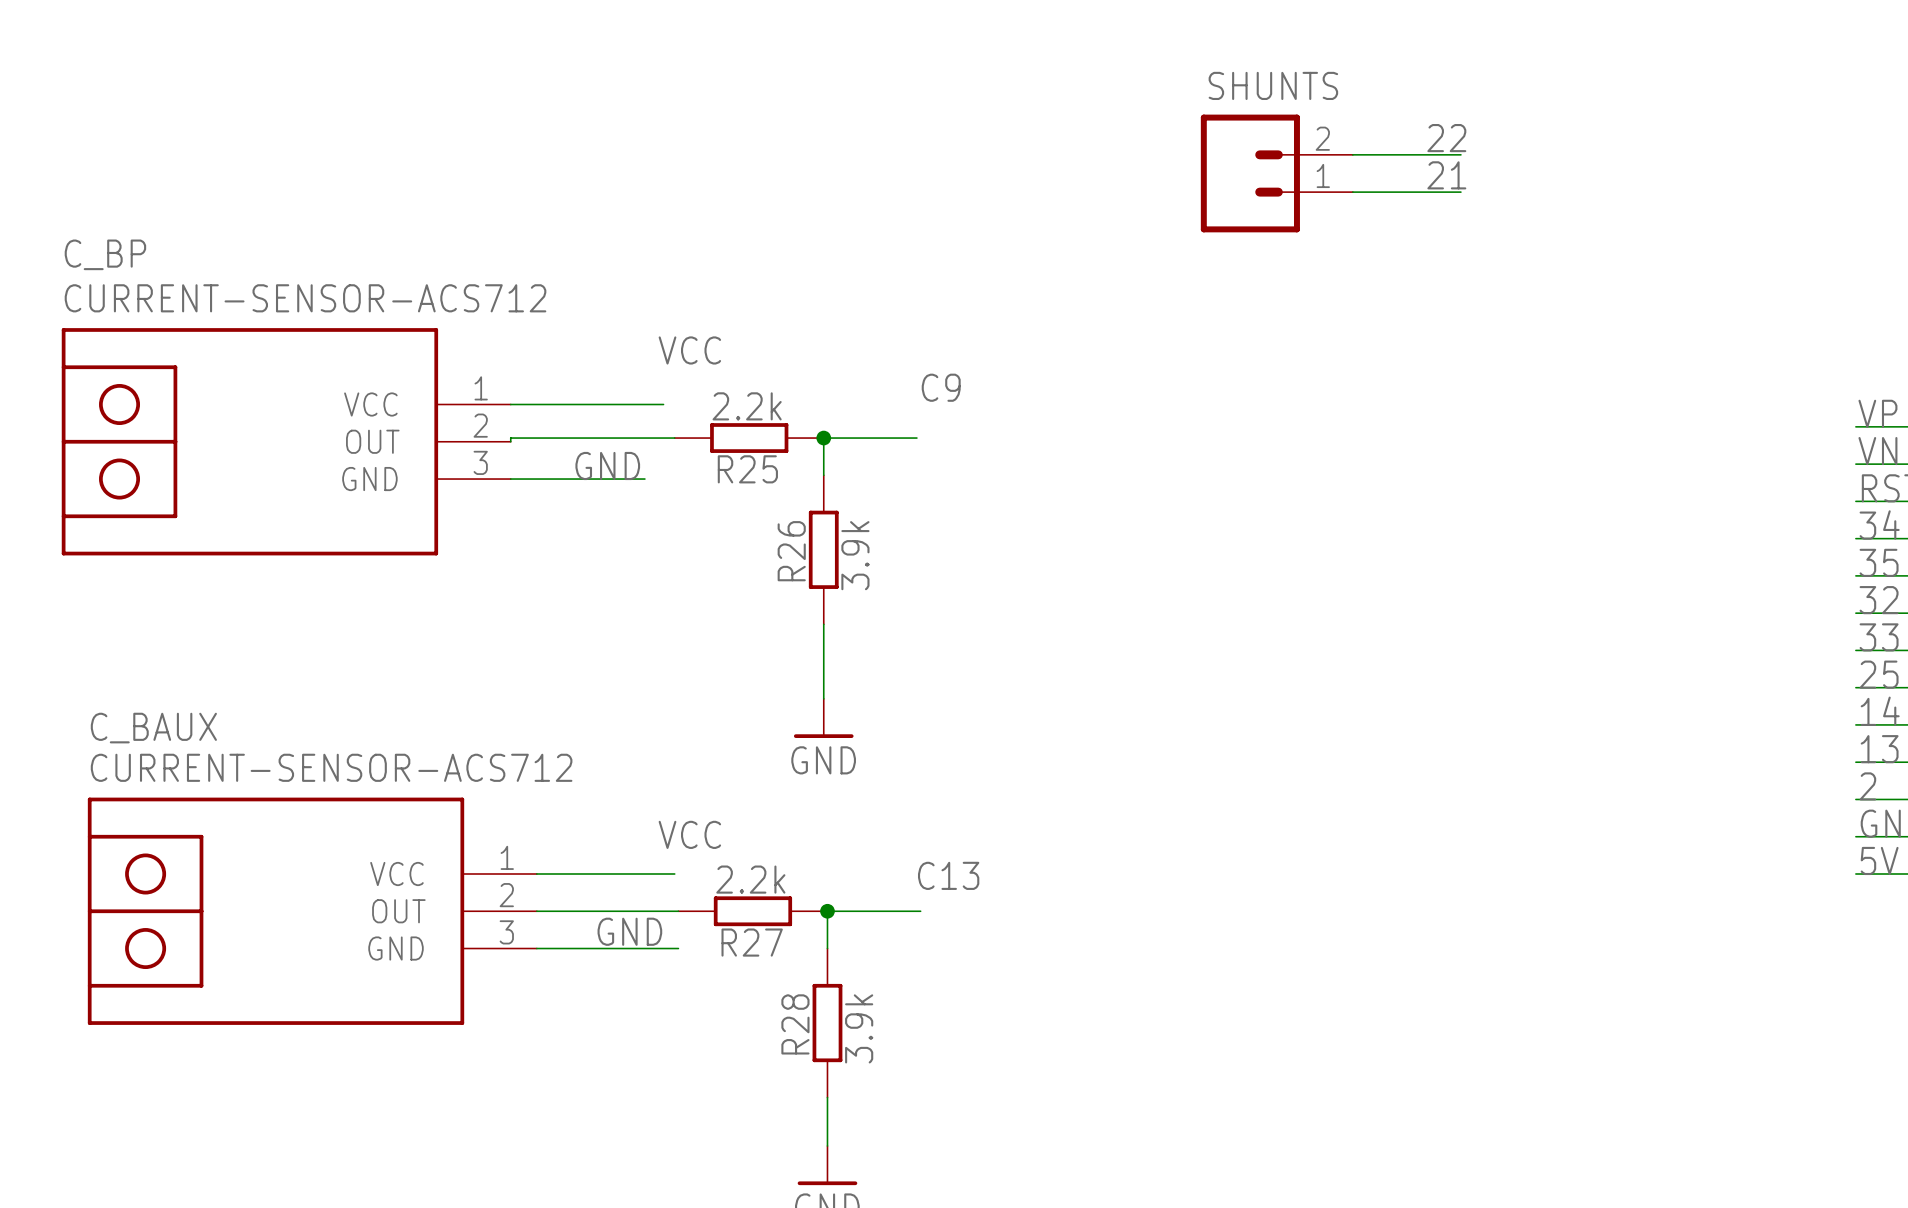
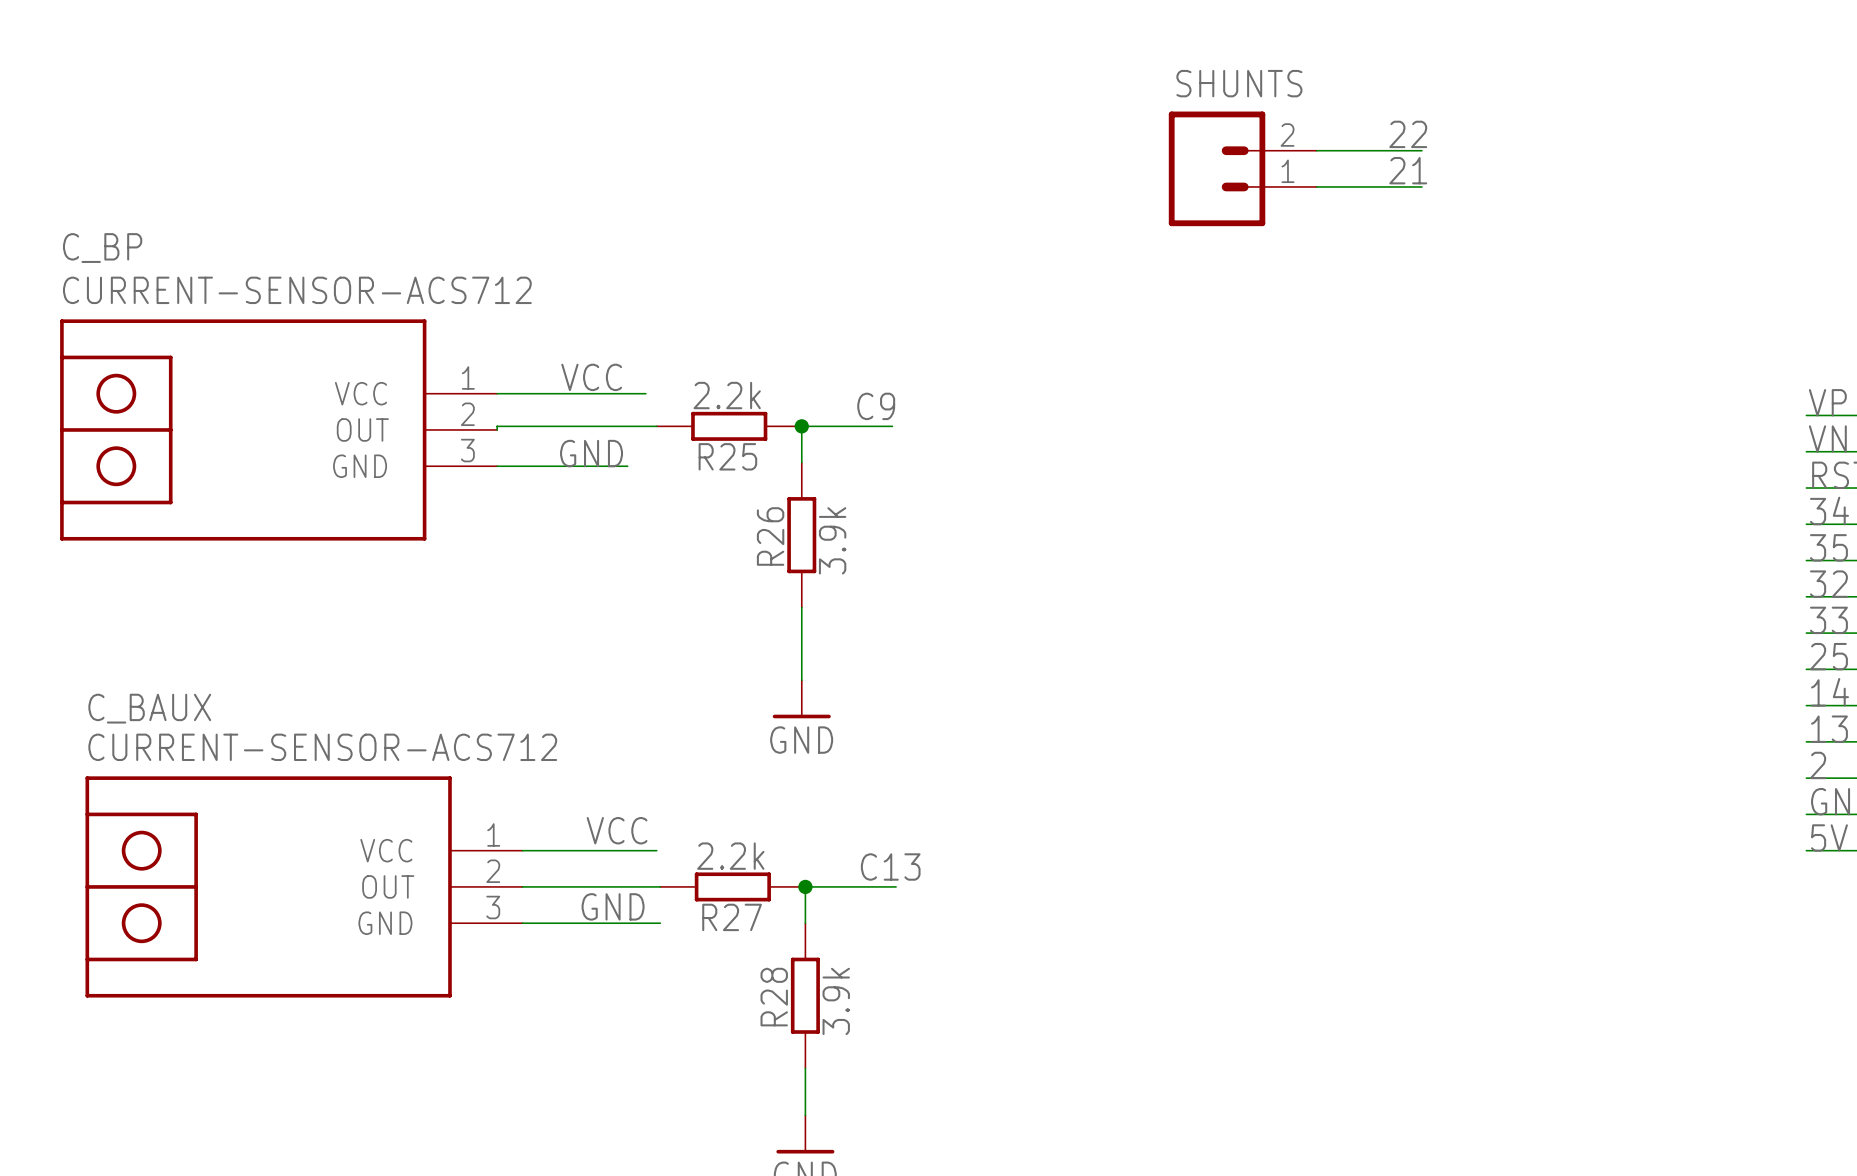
label position: VCC (689, 350) -> VCC (591, 377)
label position: C9 (941, 387) -> C9 (876, 406)
label position: VCC (689, 834) -> VCC (617, 830)
label position: C13 (948, 875) -> C13 (890, 867)

